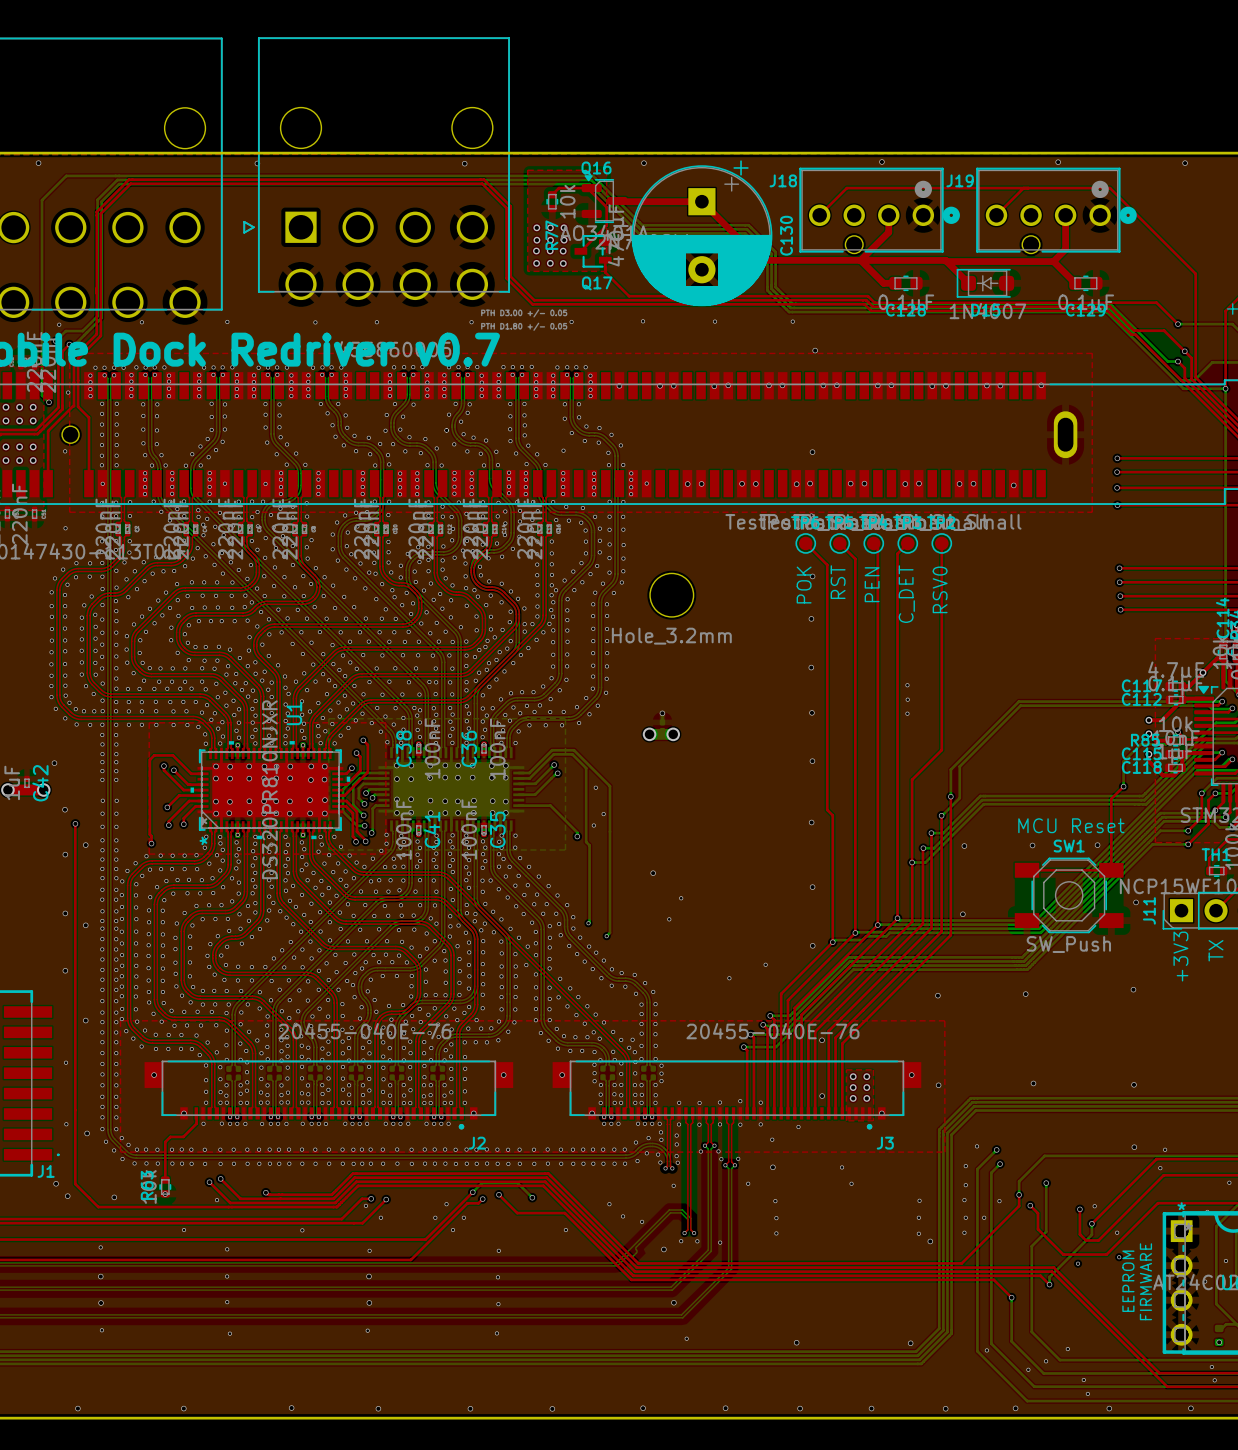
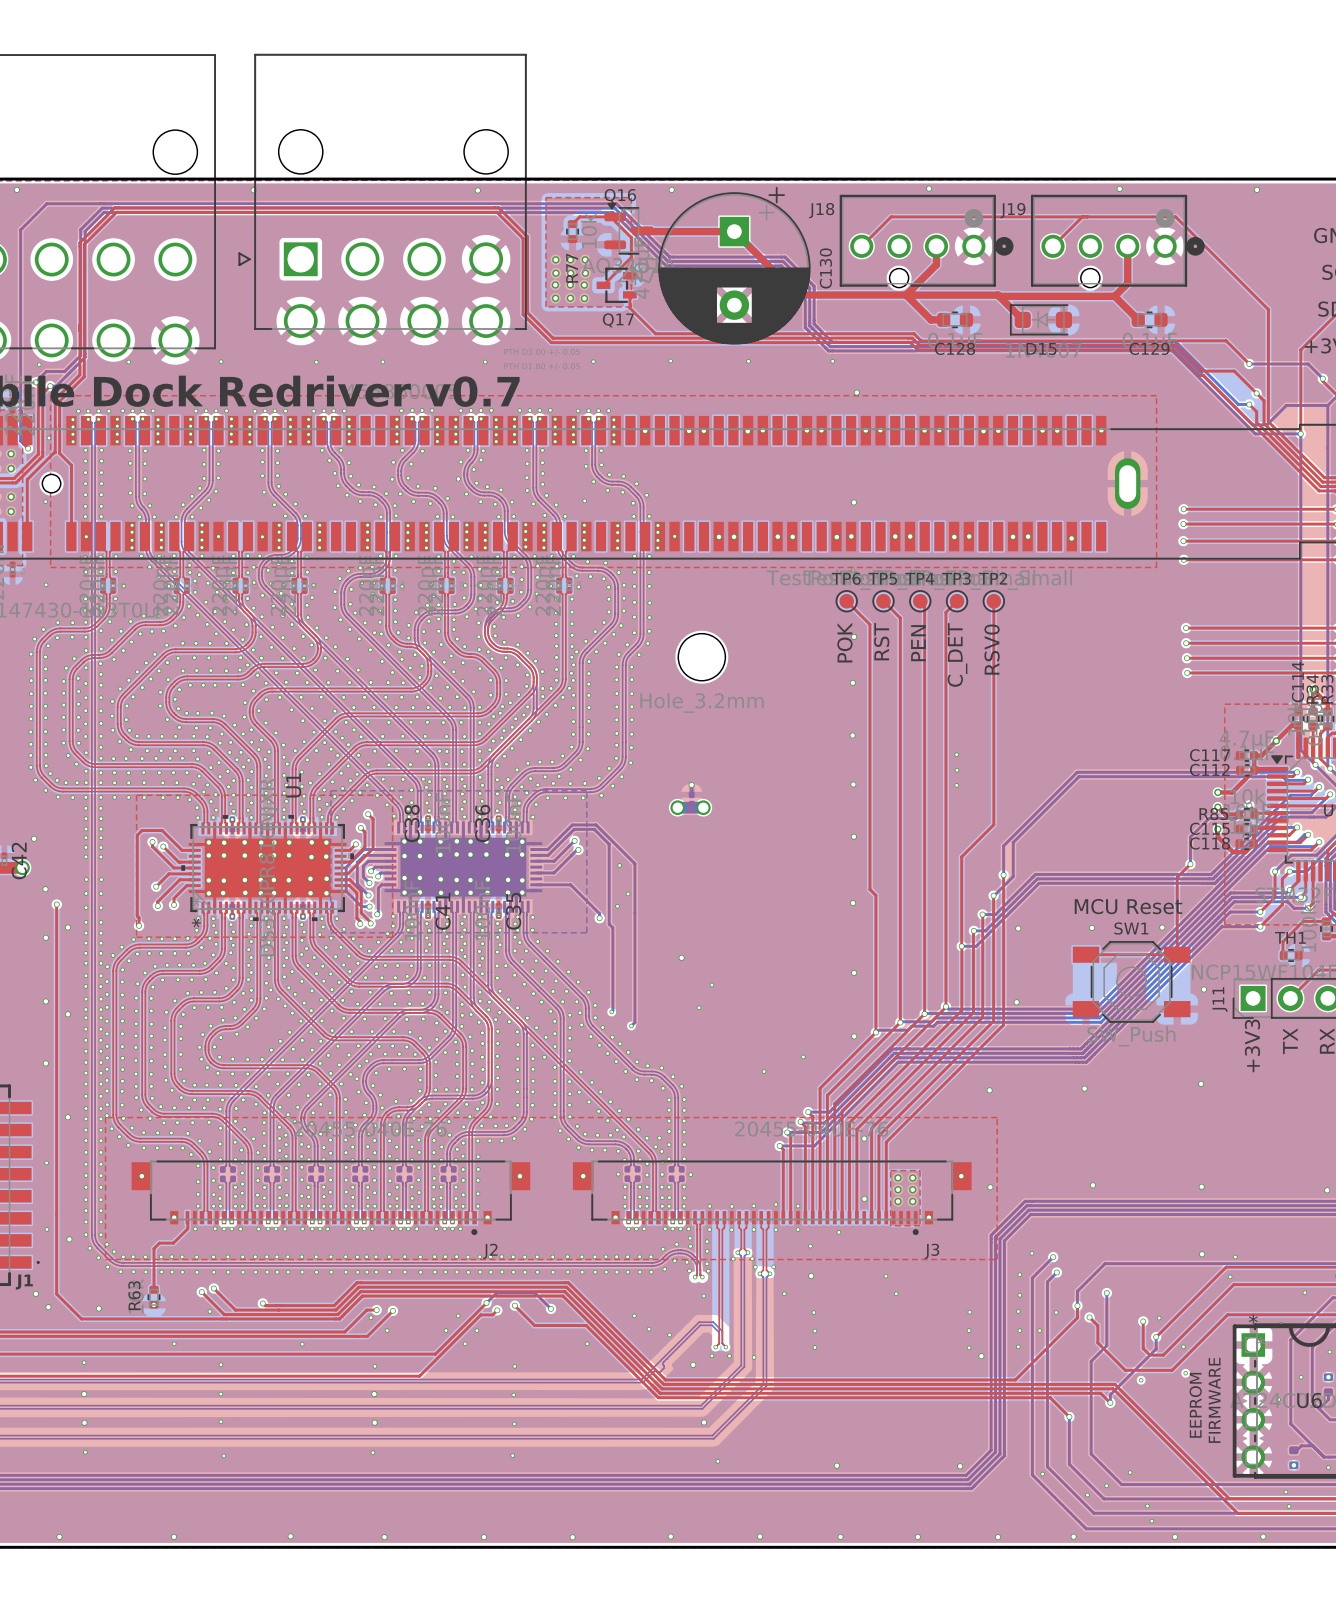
via: (594, 1064) -> none
via: (661, 1065) -> none
via: (594, 1081) -> none
via: (661, 1081) -> none

